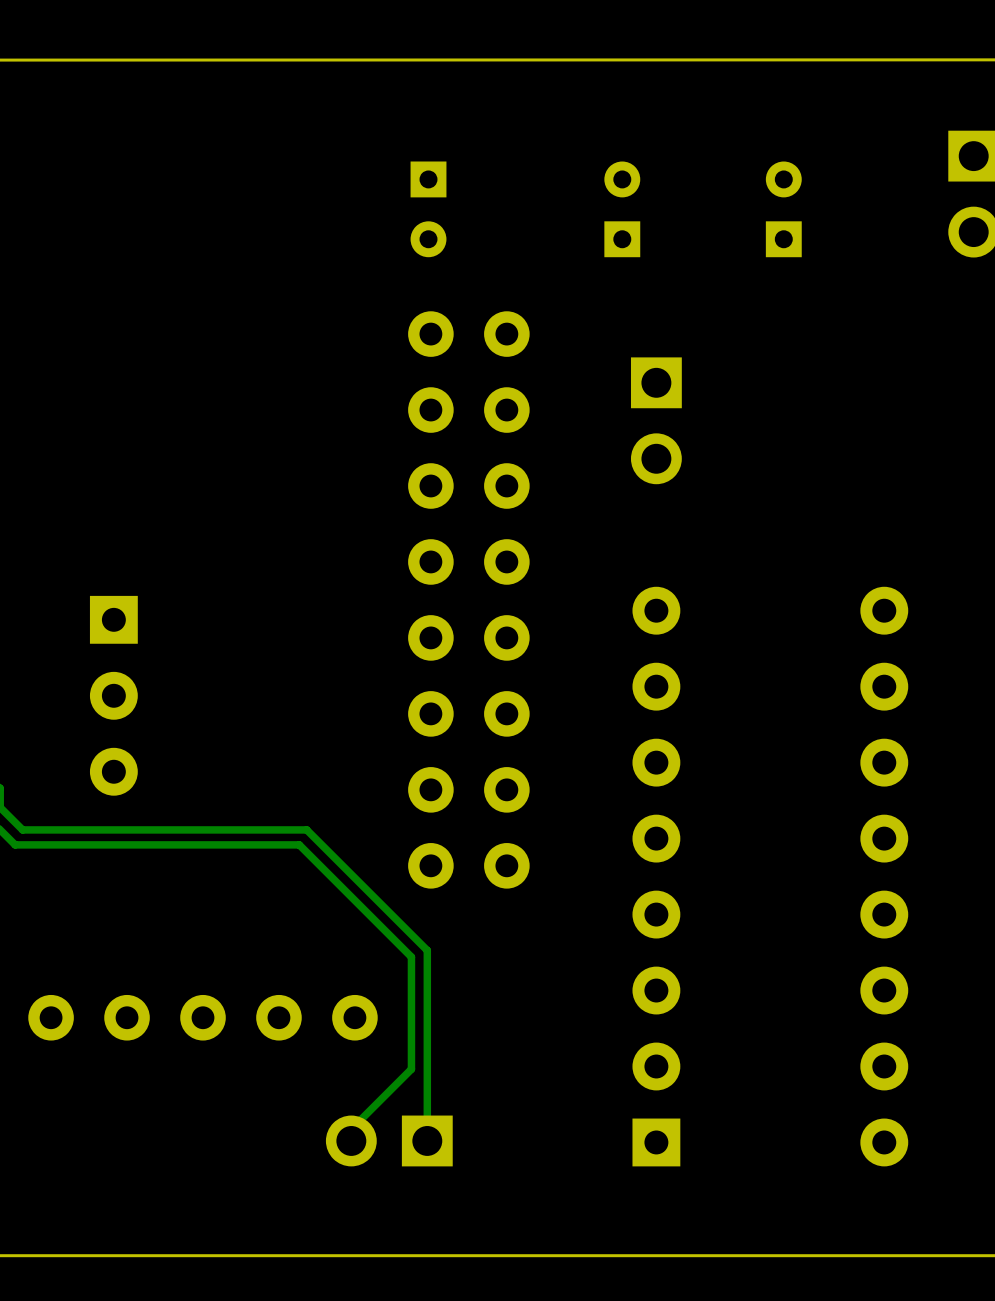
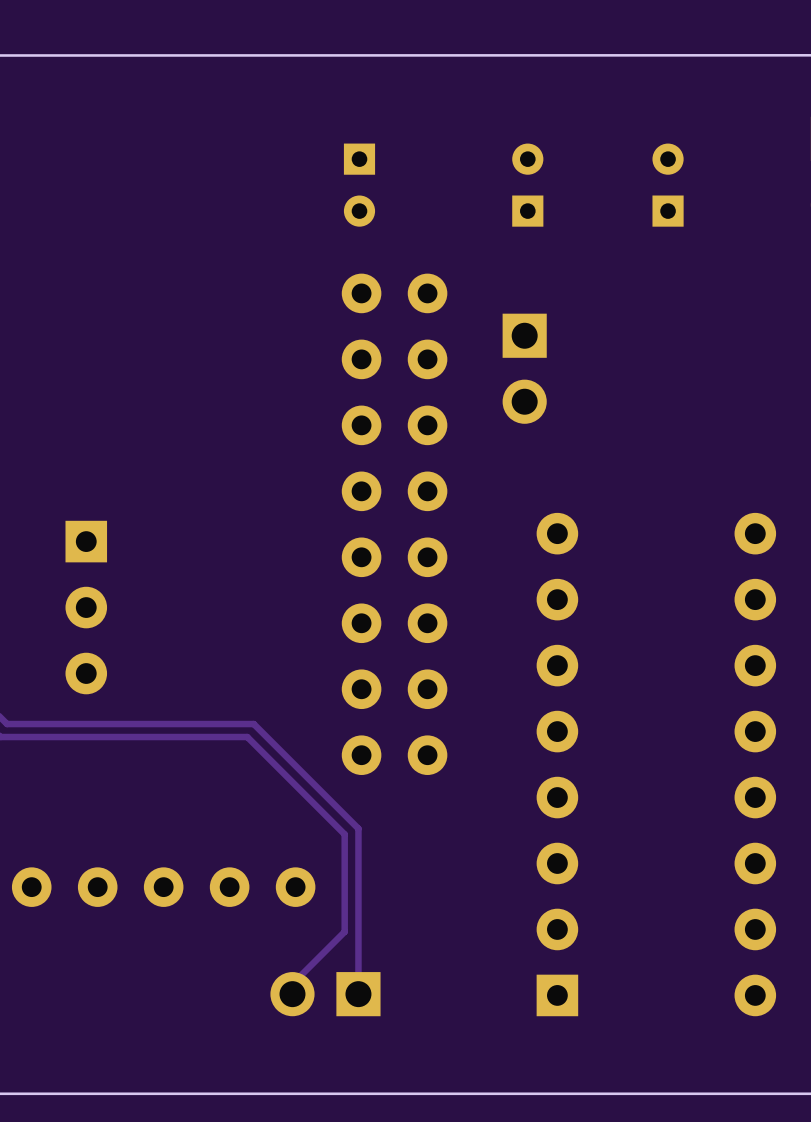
part position: (656, 420) -> (524, 368)

